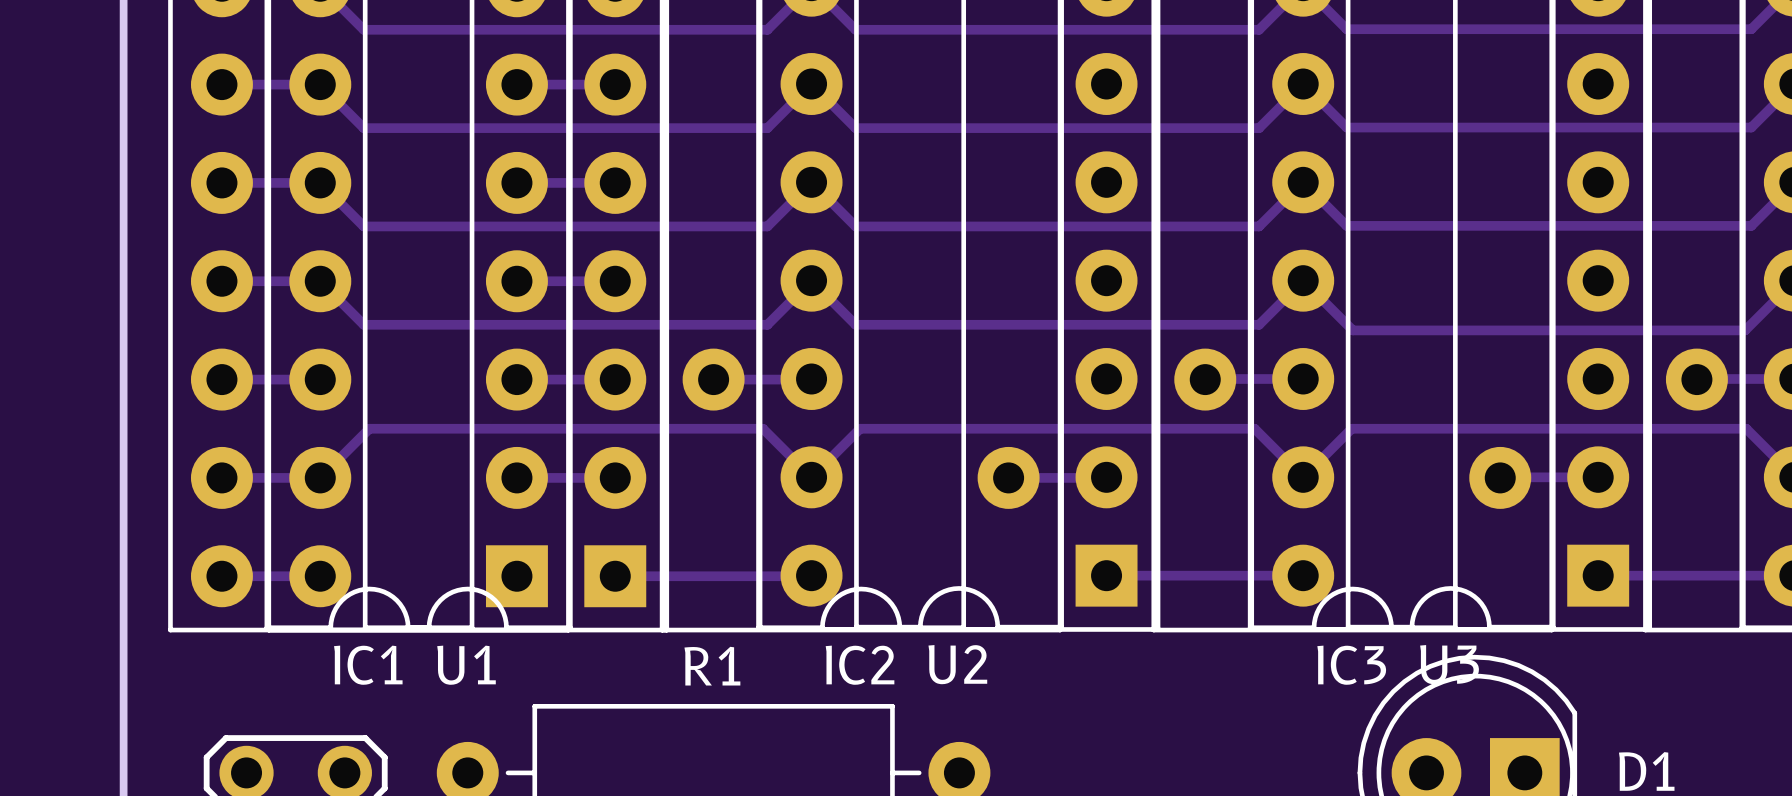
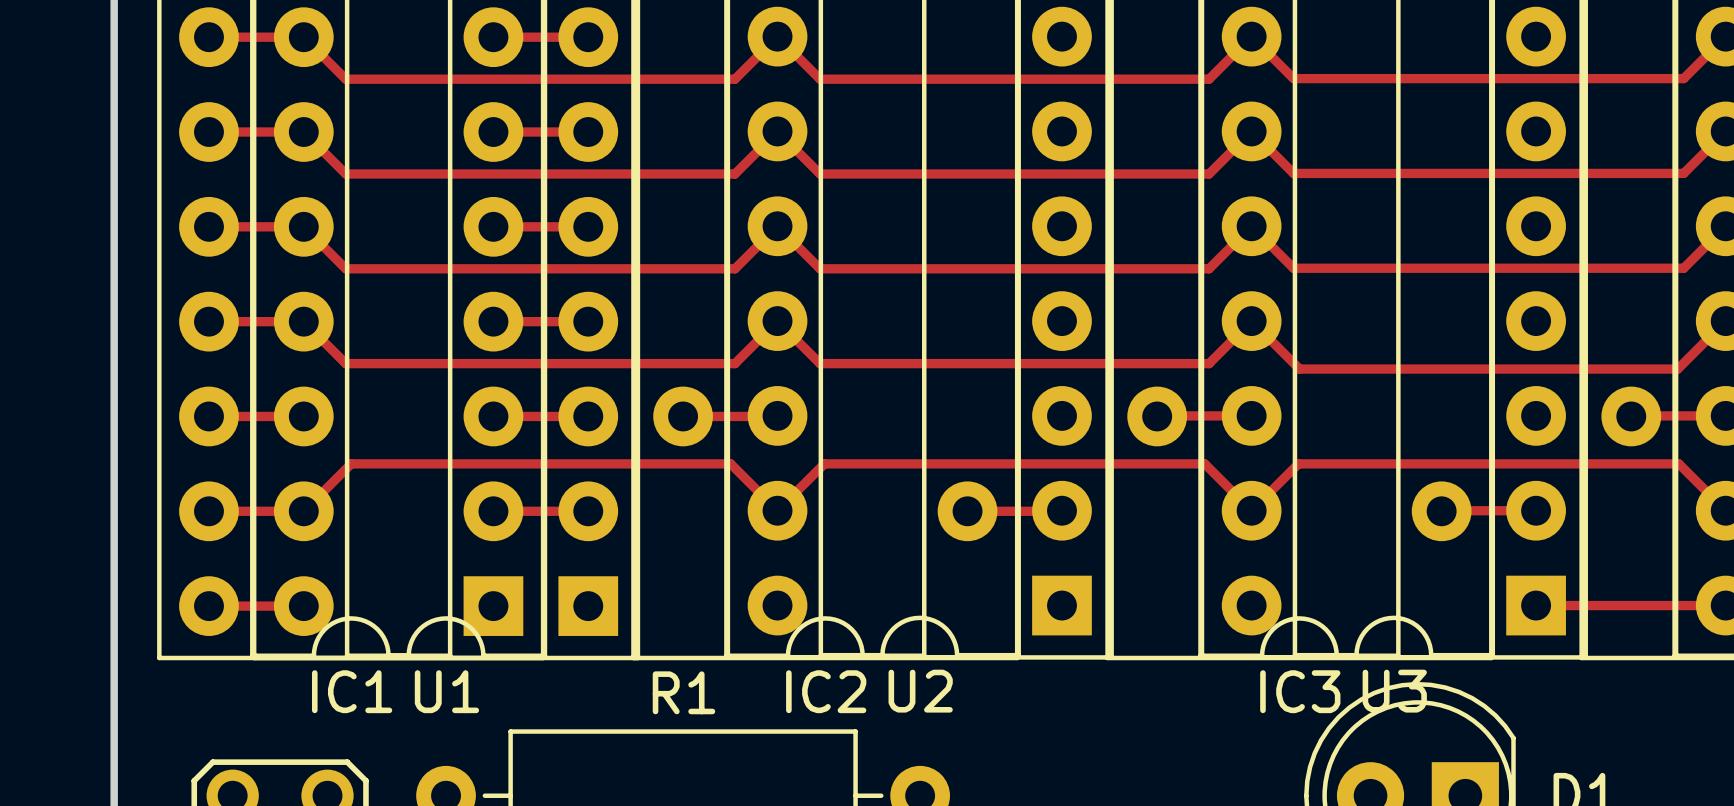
track: (811, 575) (615, 576) -> none
track: (1106, 575) (1303, 575) -> none

